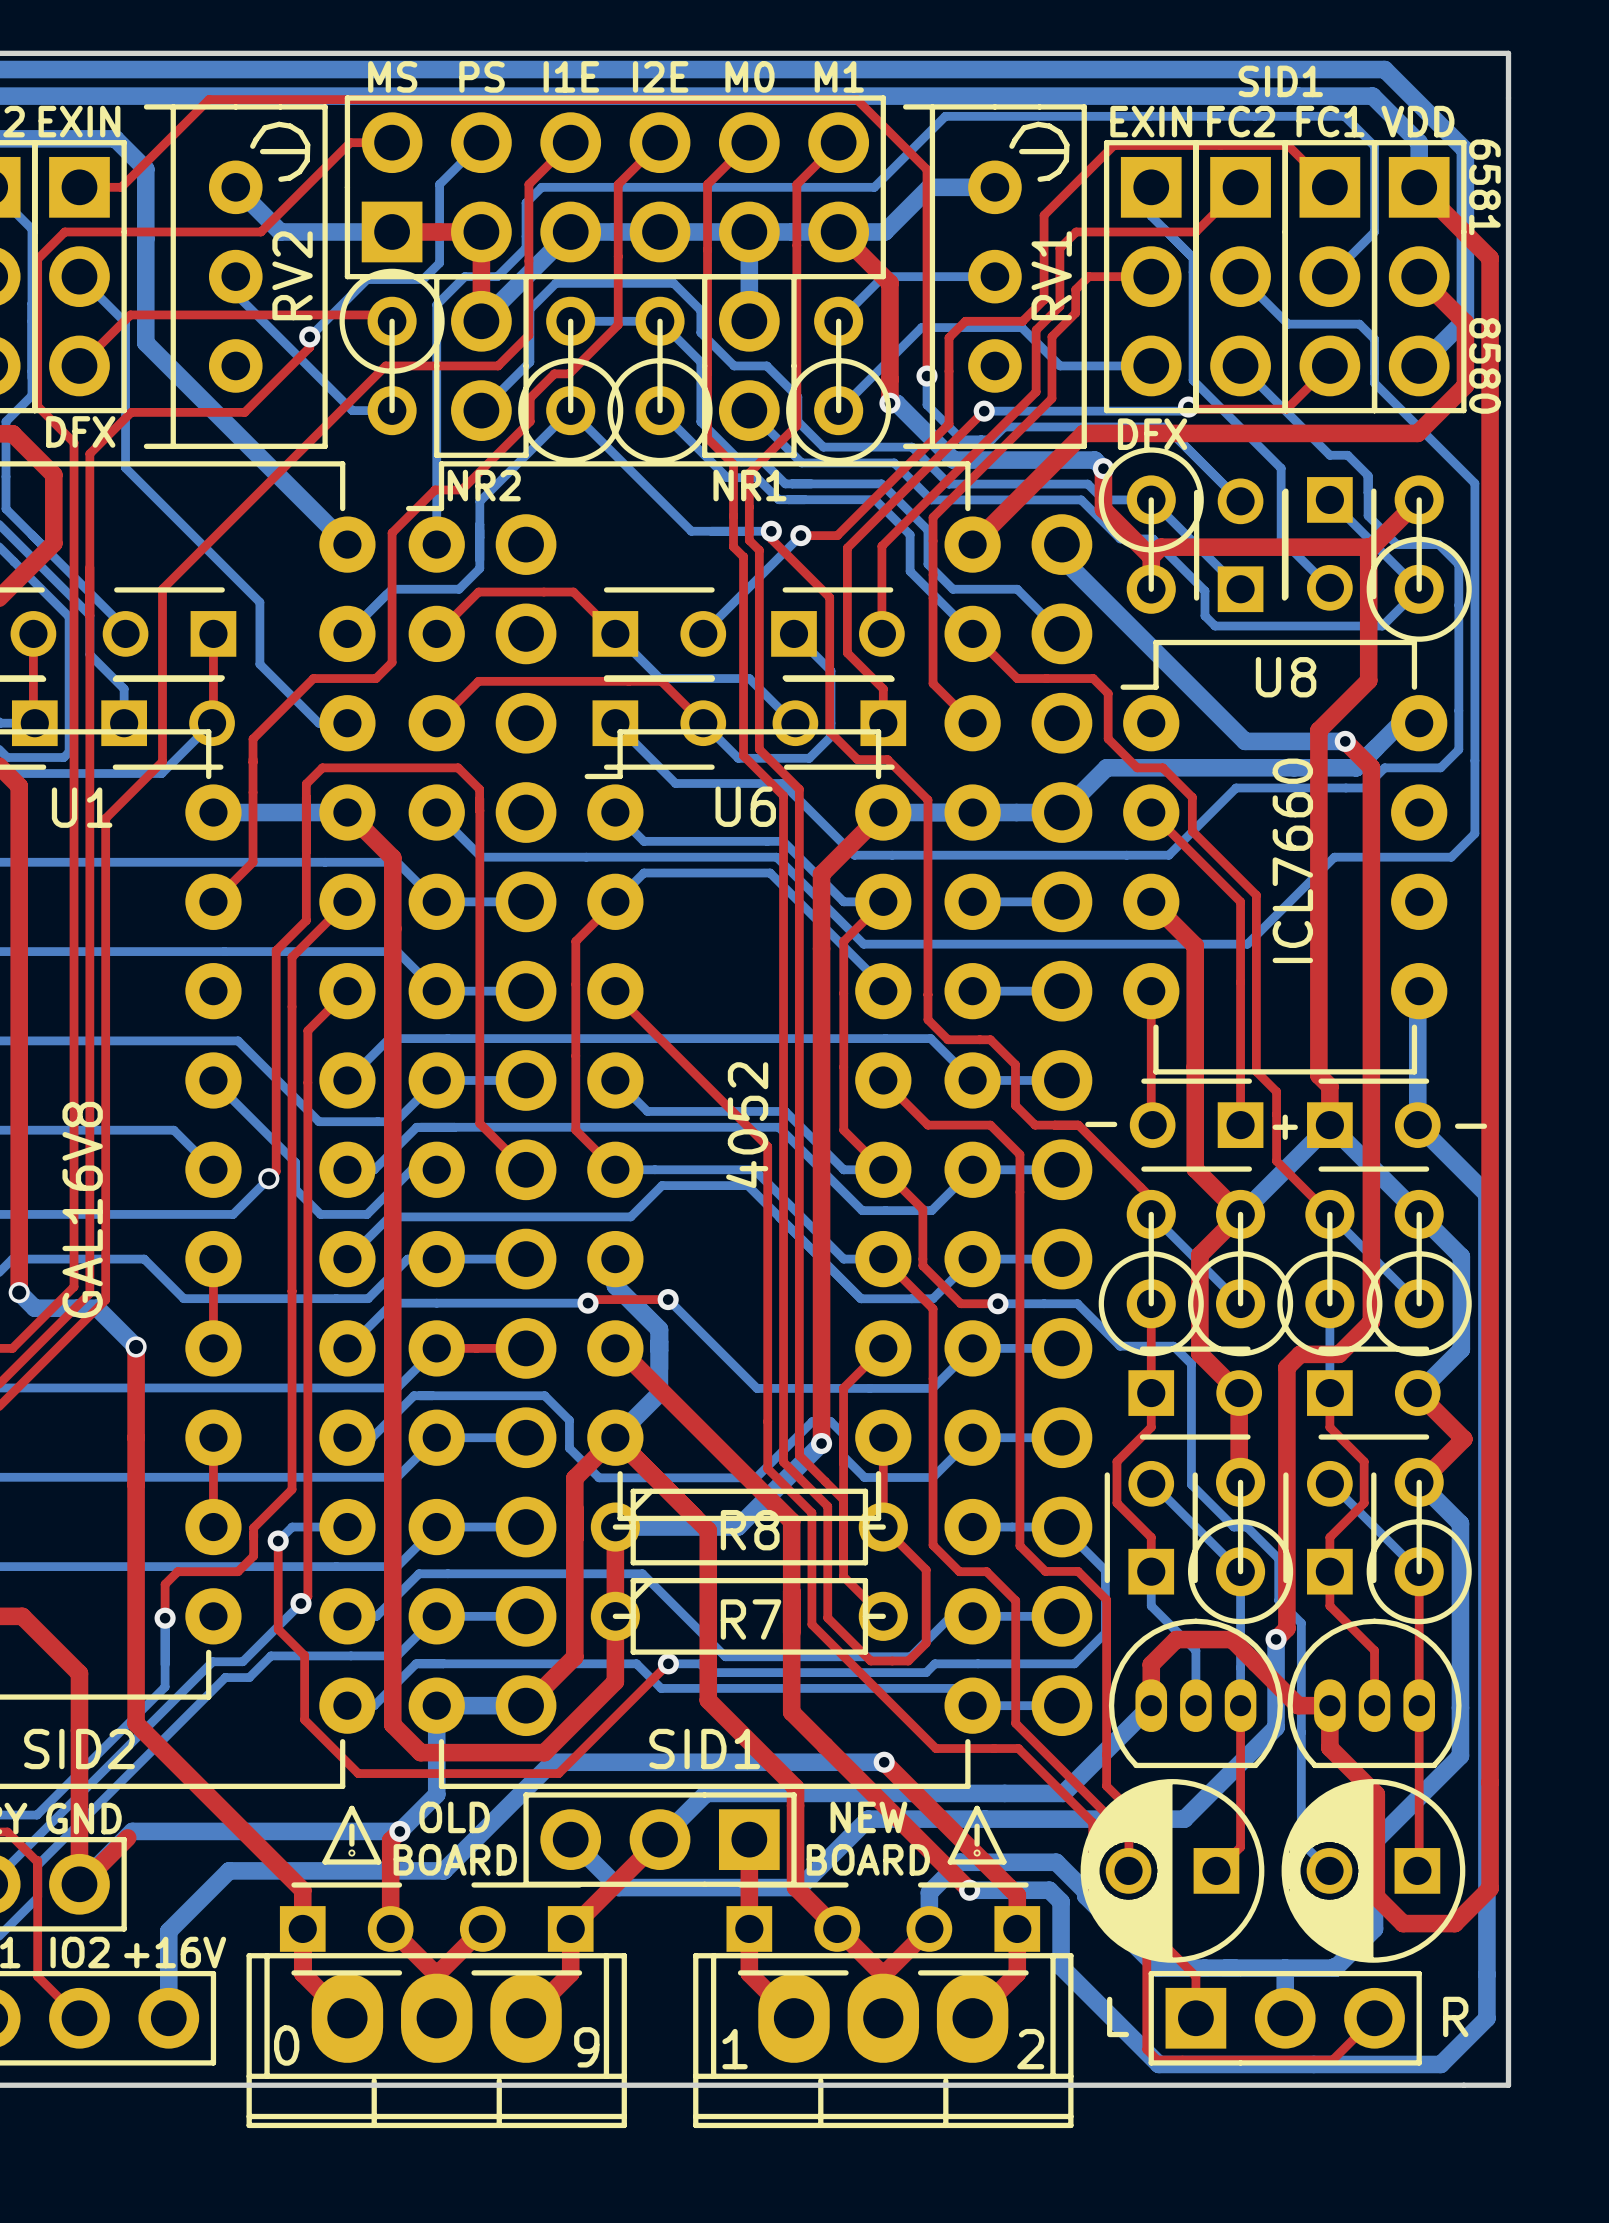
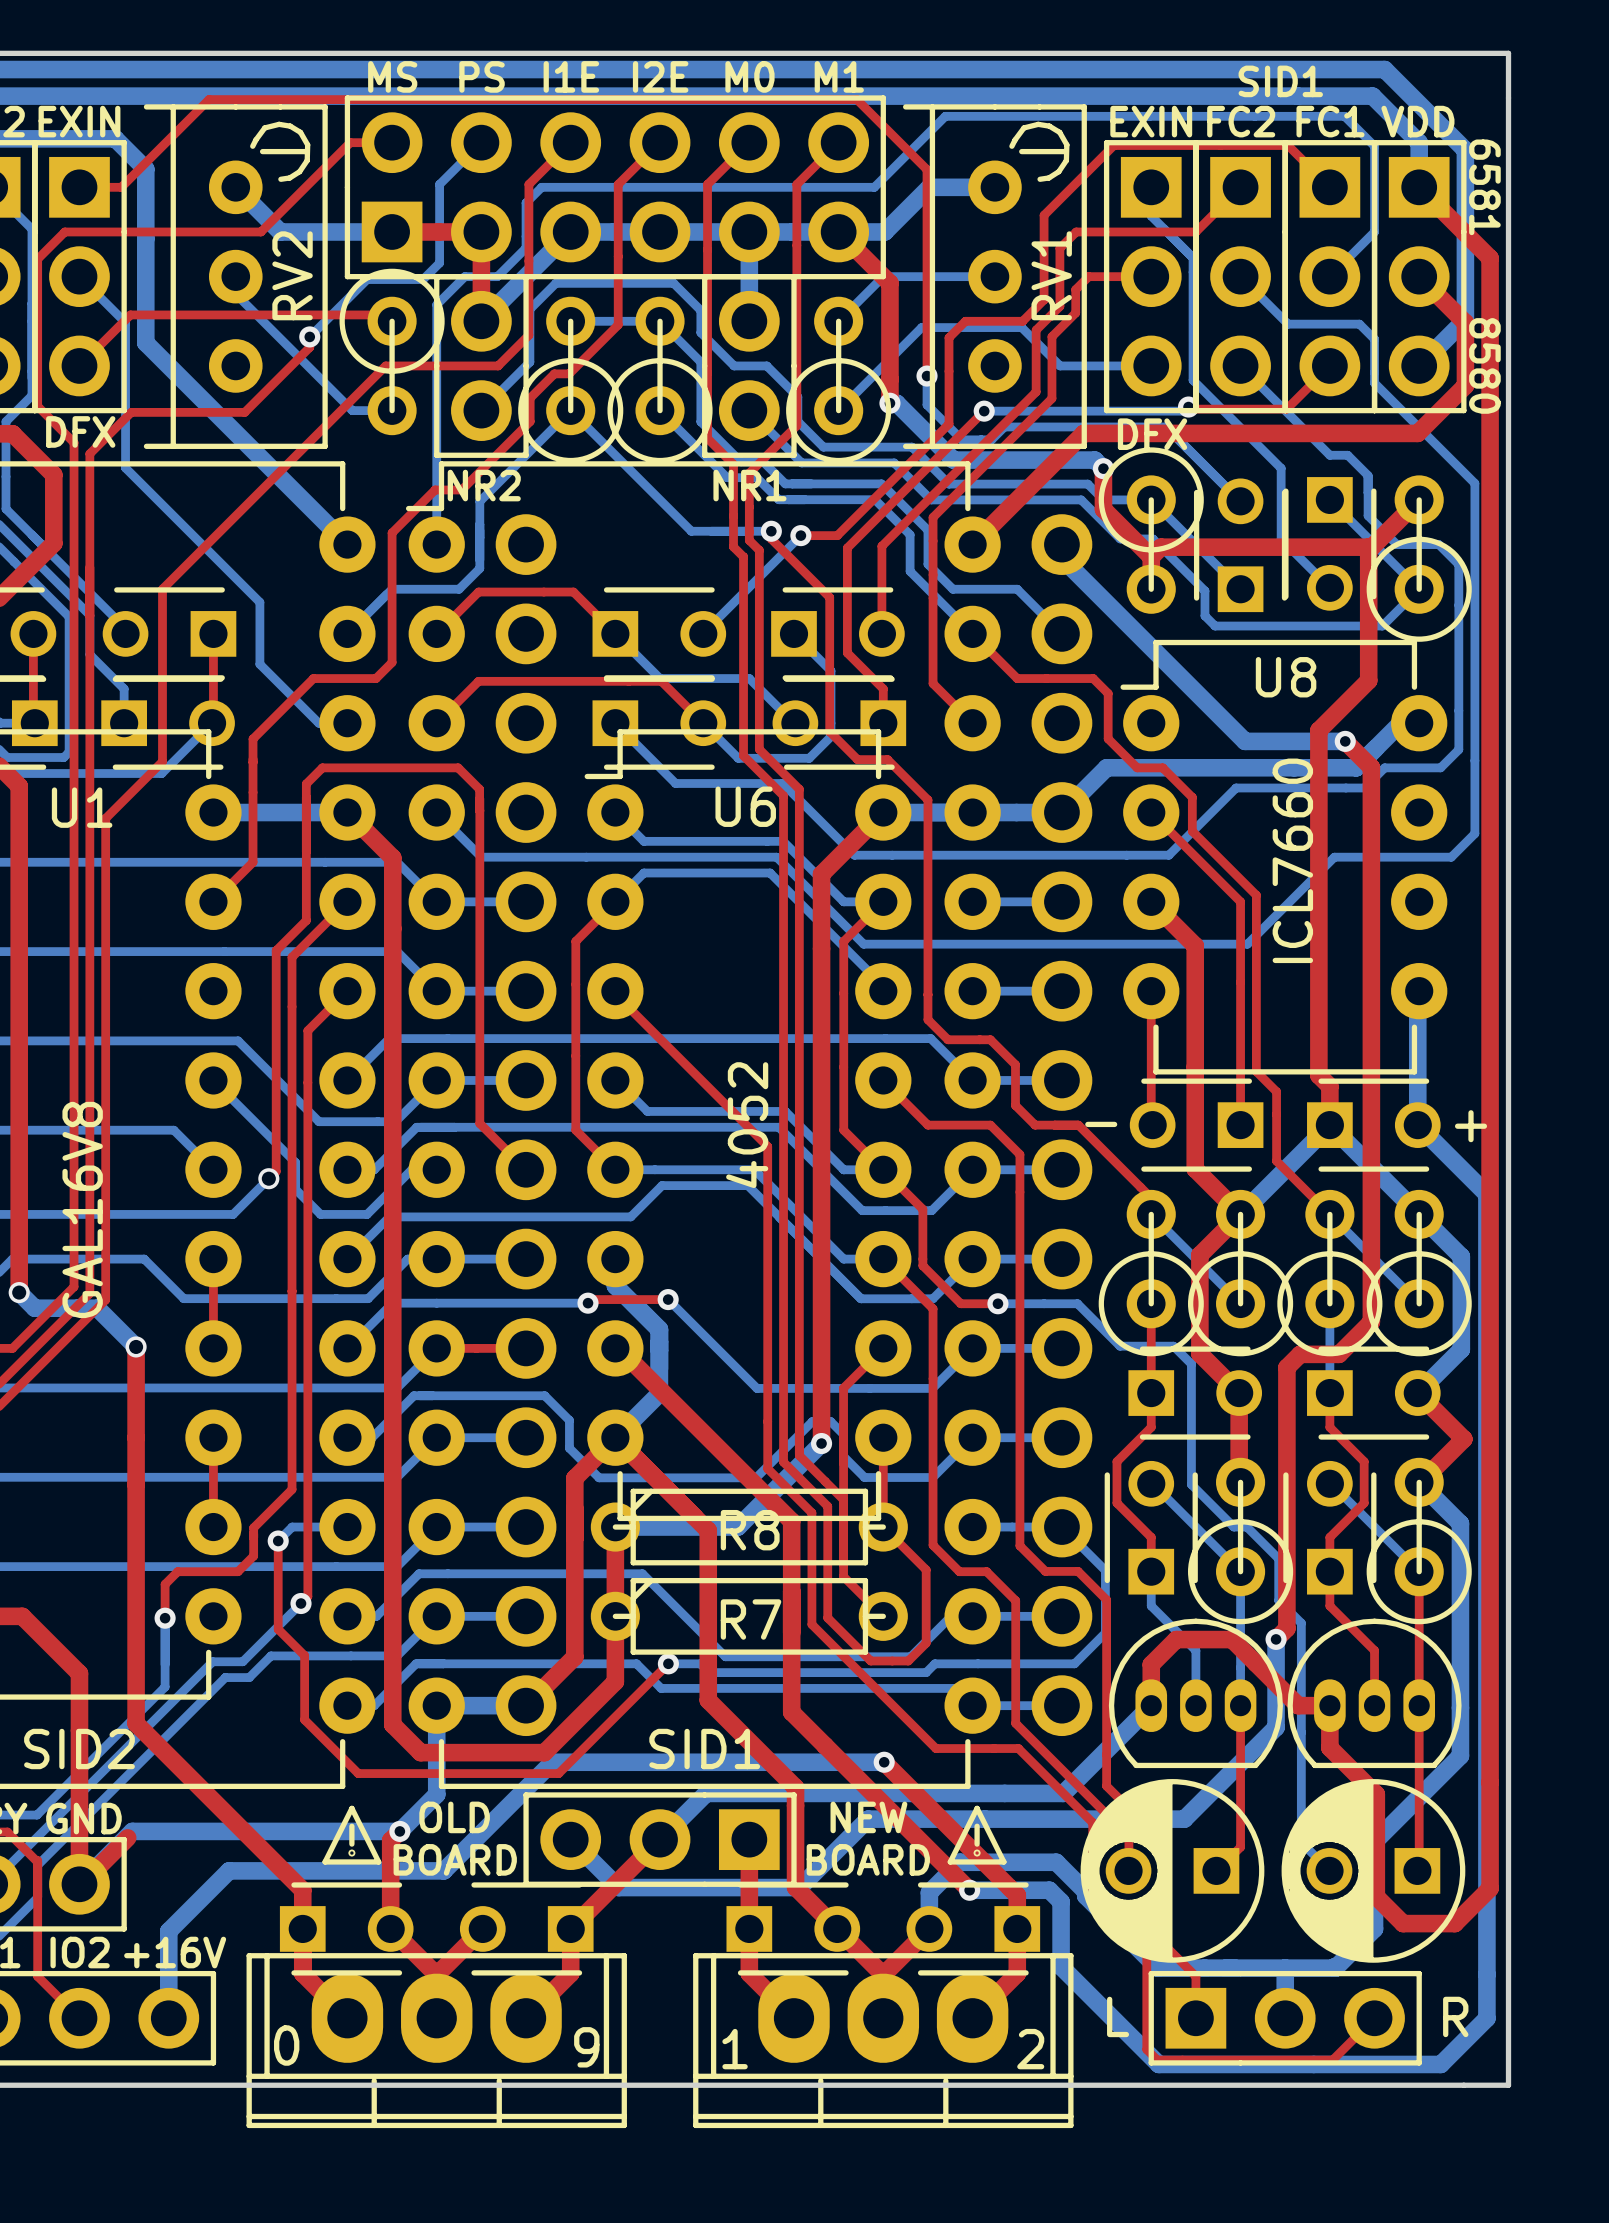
text: - (1471, 1126) -> + (1471, 1126)
text: + (1285, 1127) -> none

